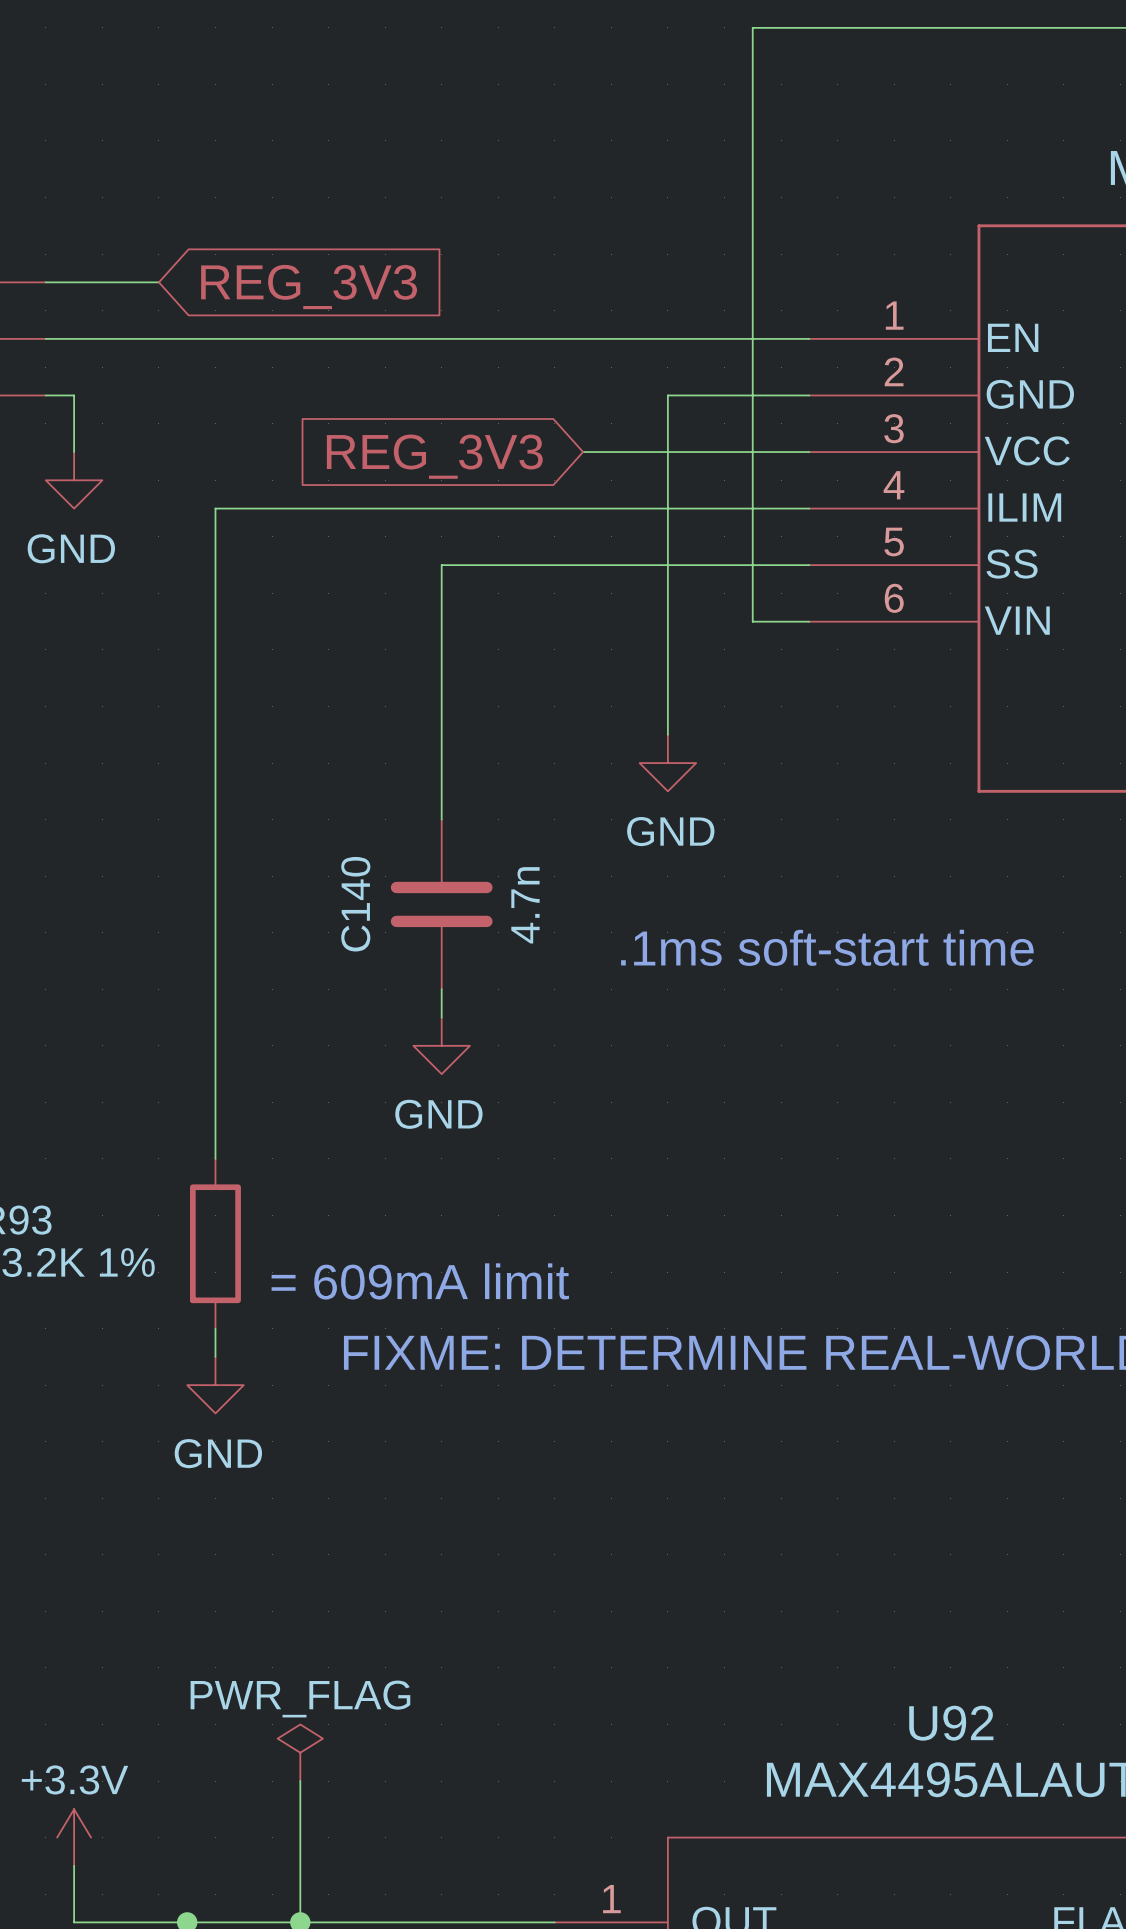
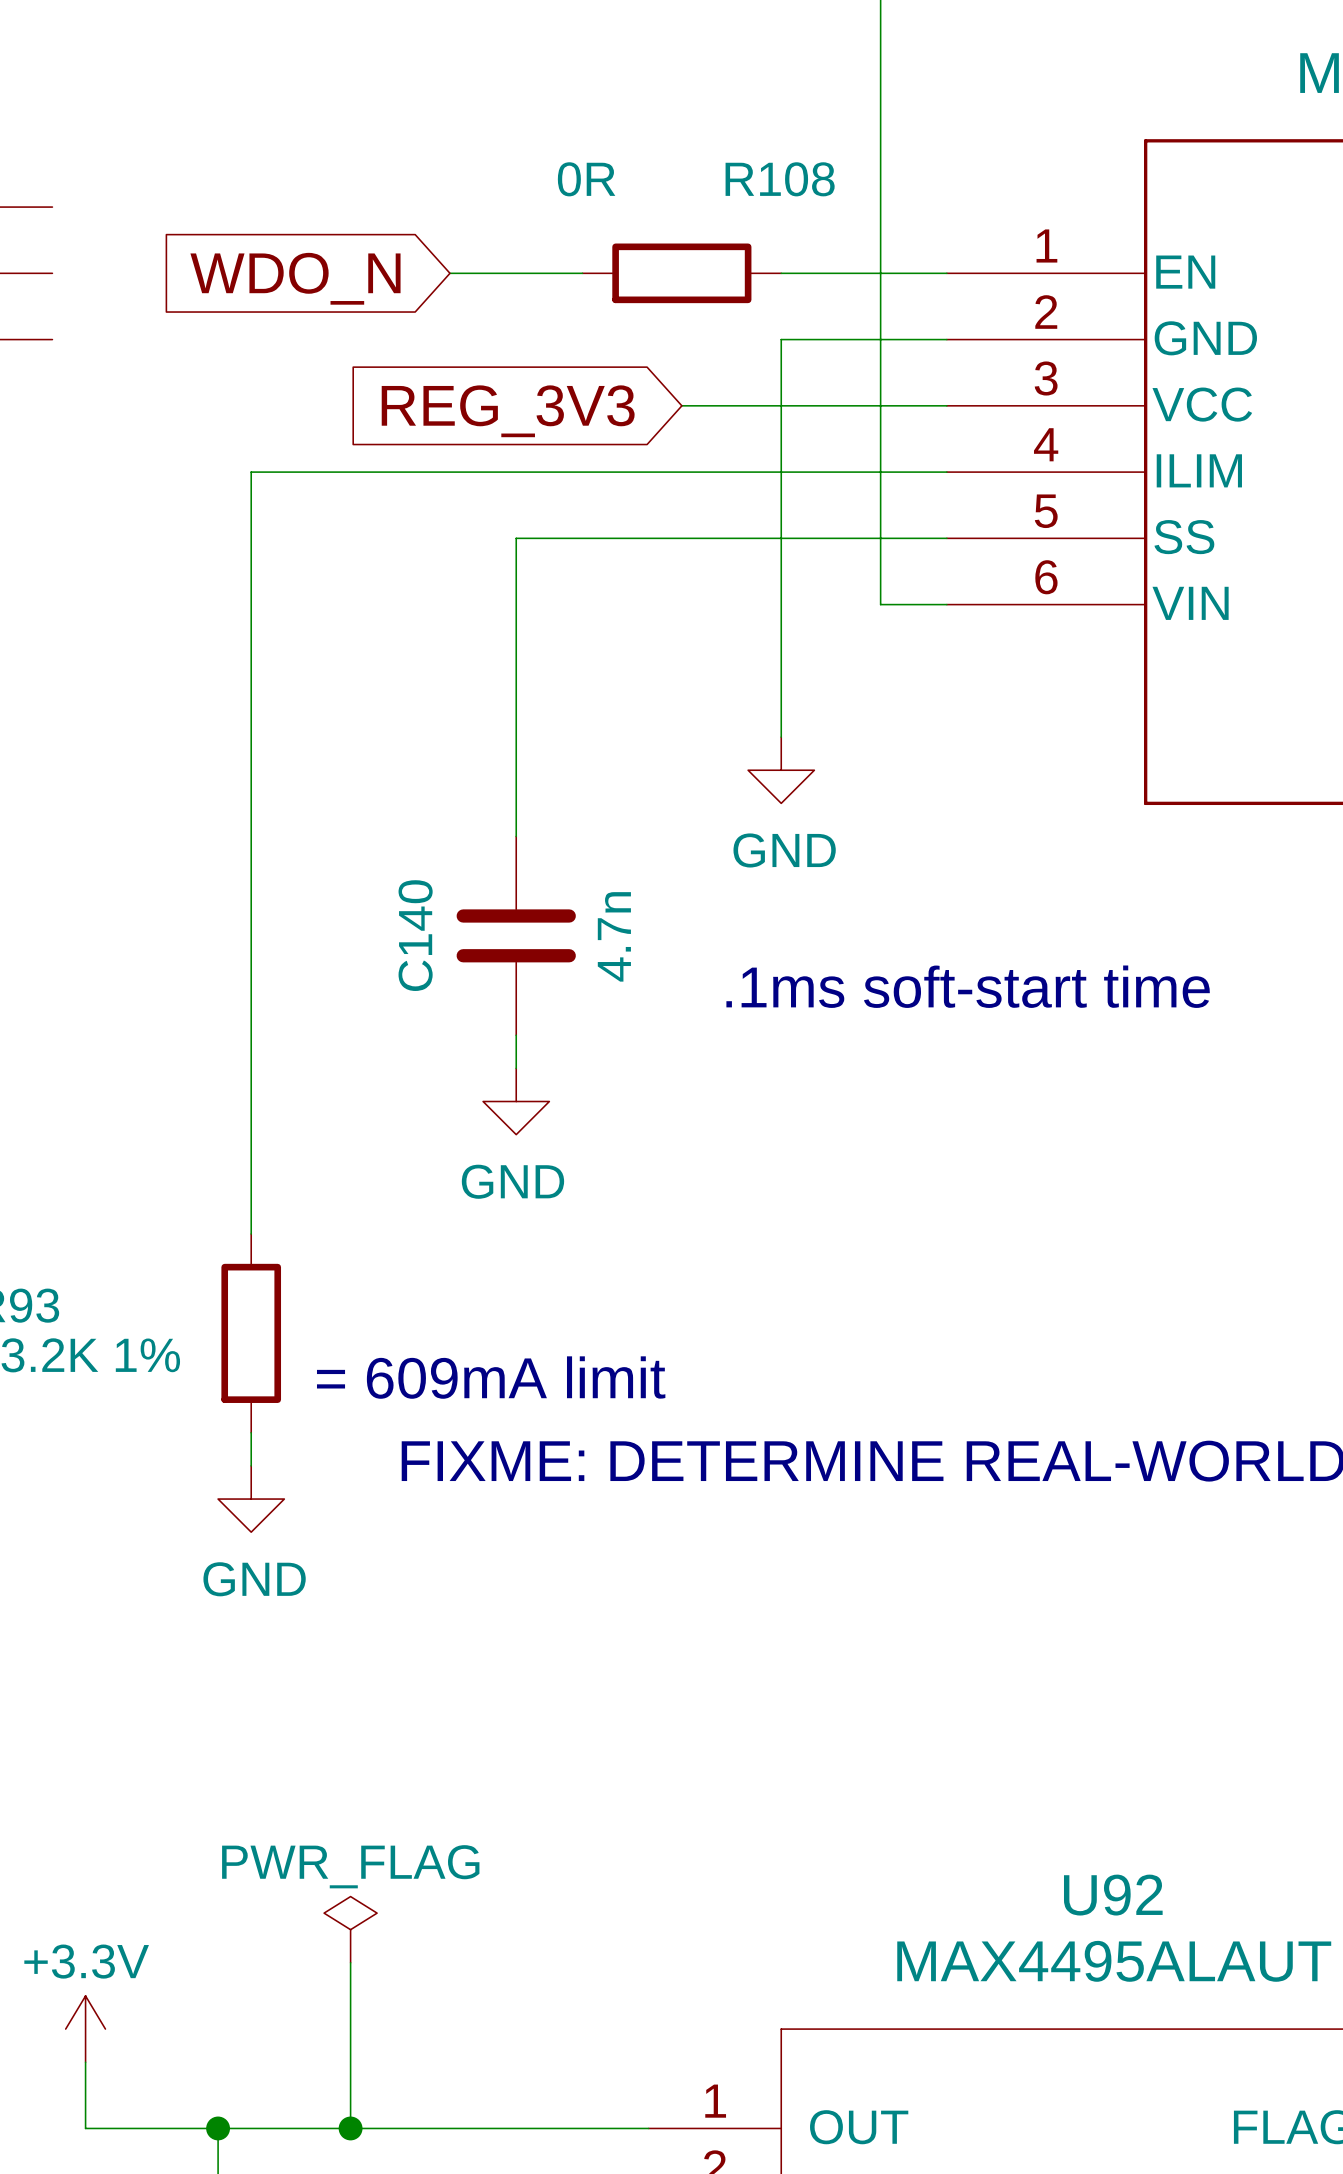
wire: (45, 282) (158, 282) -> none
global label: REG_3V3 (309, 287) -> none
wire: (45, 338) (385, 338) -> none
wire: (498, 338) (667, 338) -> none
R108: none -> 0R (681, 273)
global label: none -> WDO_N (295, 278)
wire: (45, 395) (74, 395) (74, 452) -> none
power symbol: GND (74, 480) -> none

